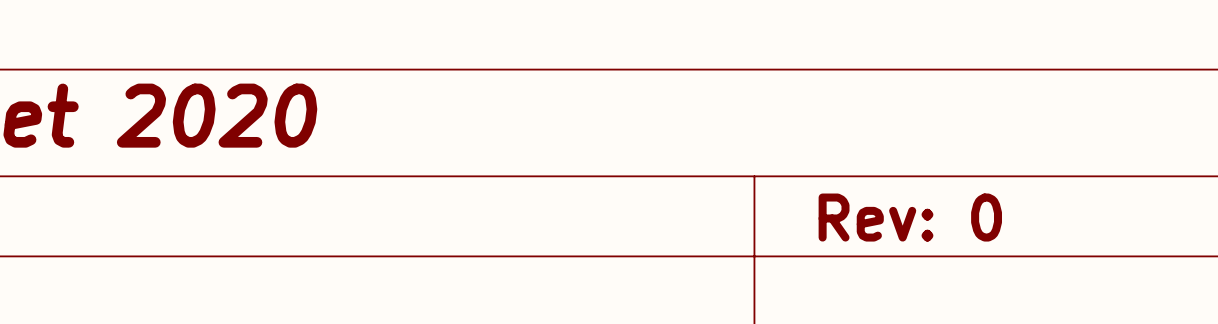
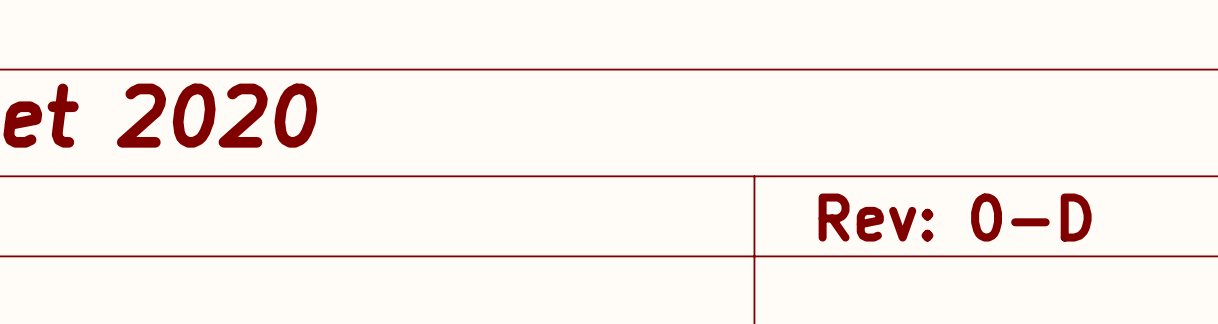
title block: Rev: 0 (910, 217) -> Rev: 0-D (955, 217)

